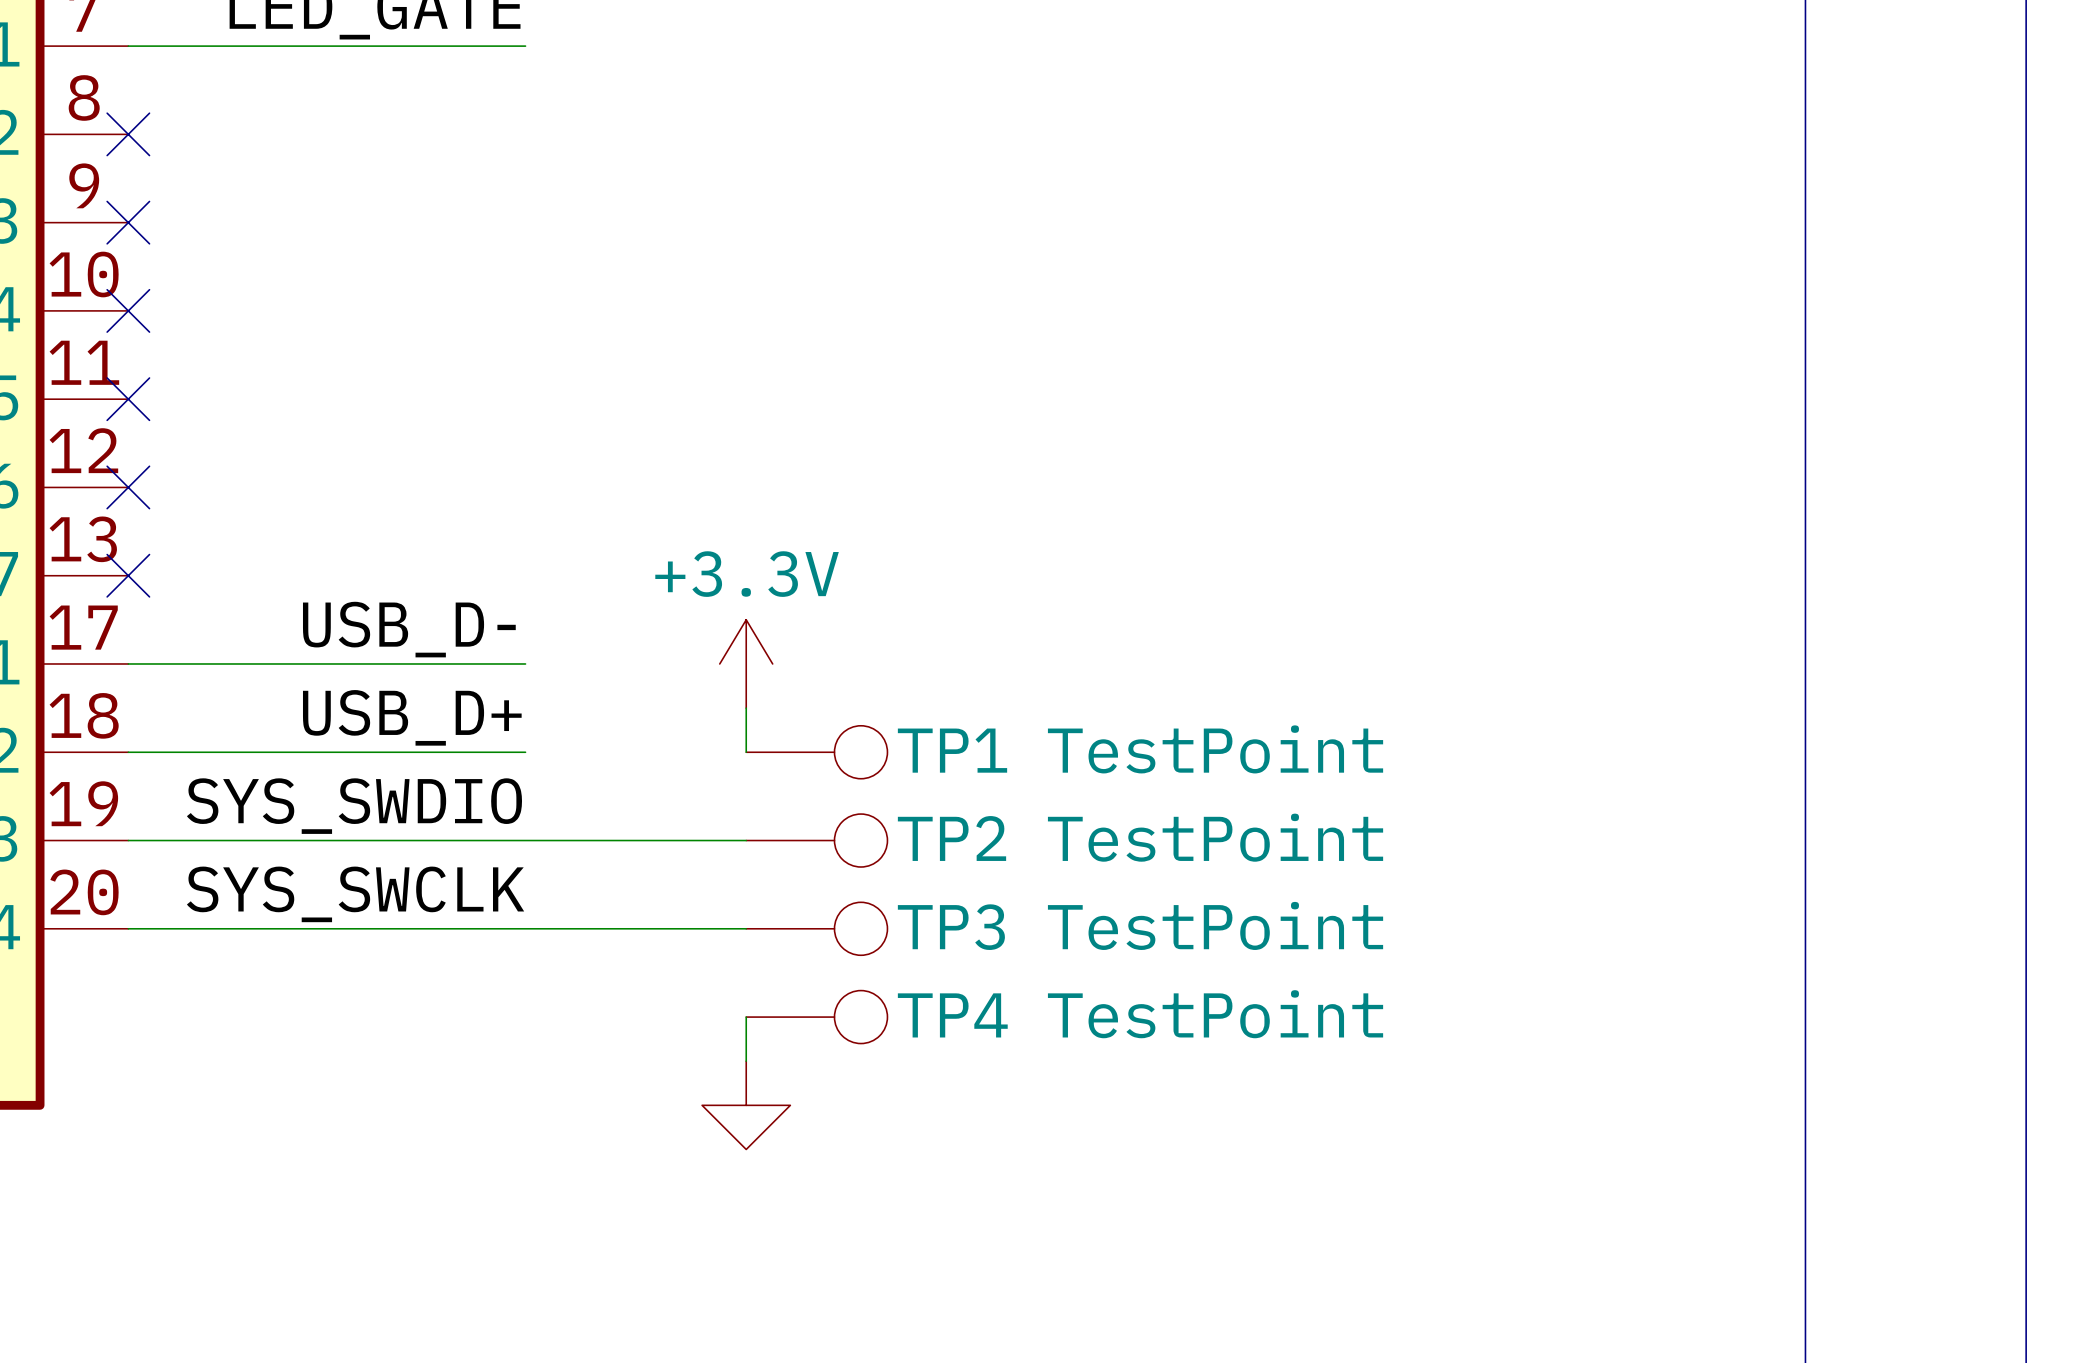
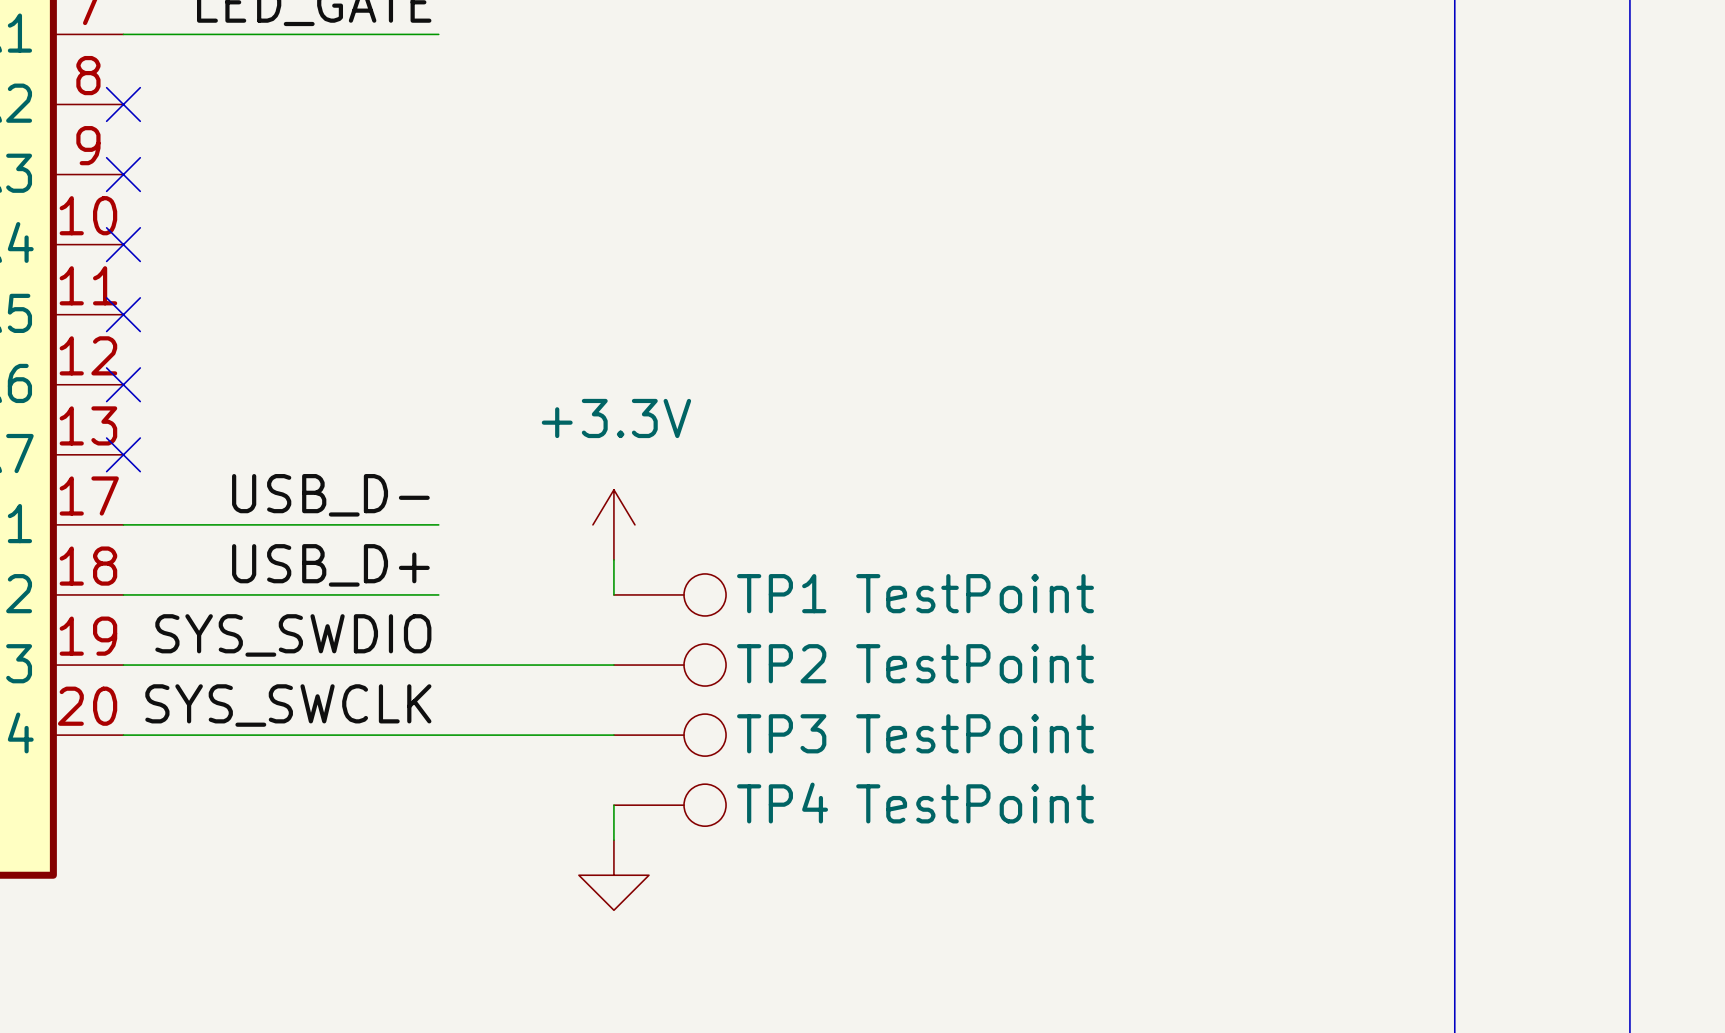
power symbol text position: +3.3V (747, 574) -> +3.3V (616, 418)

